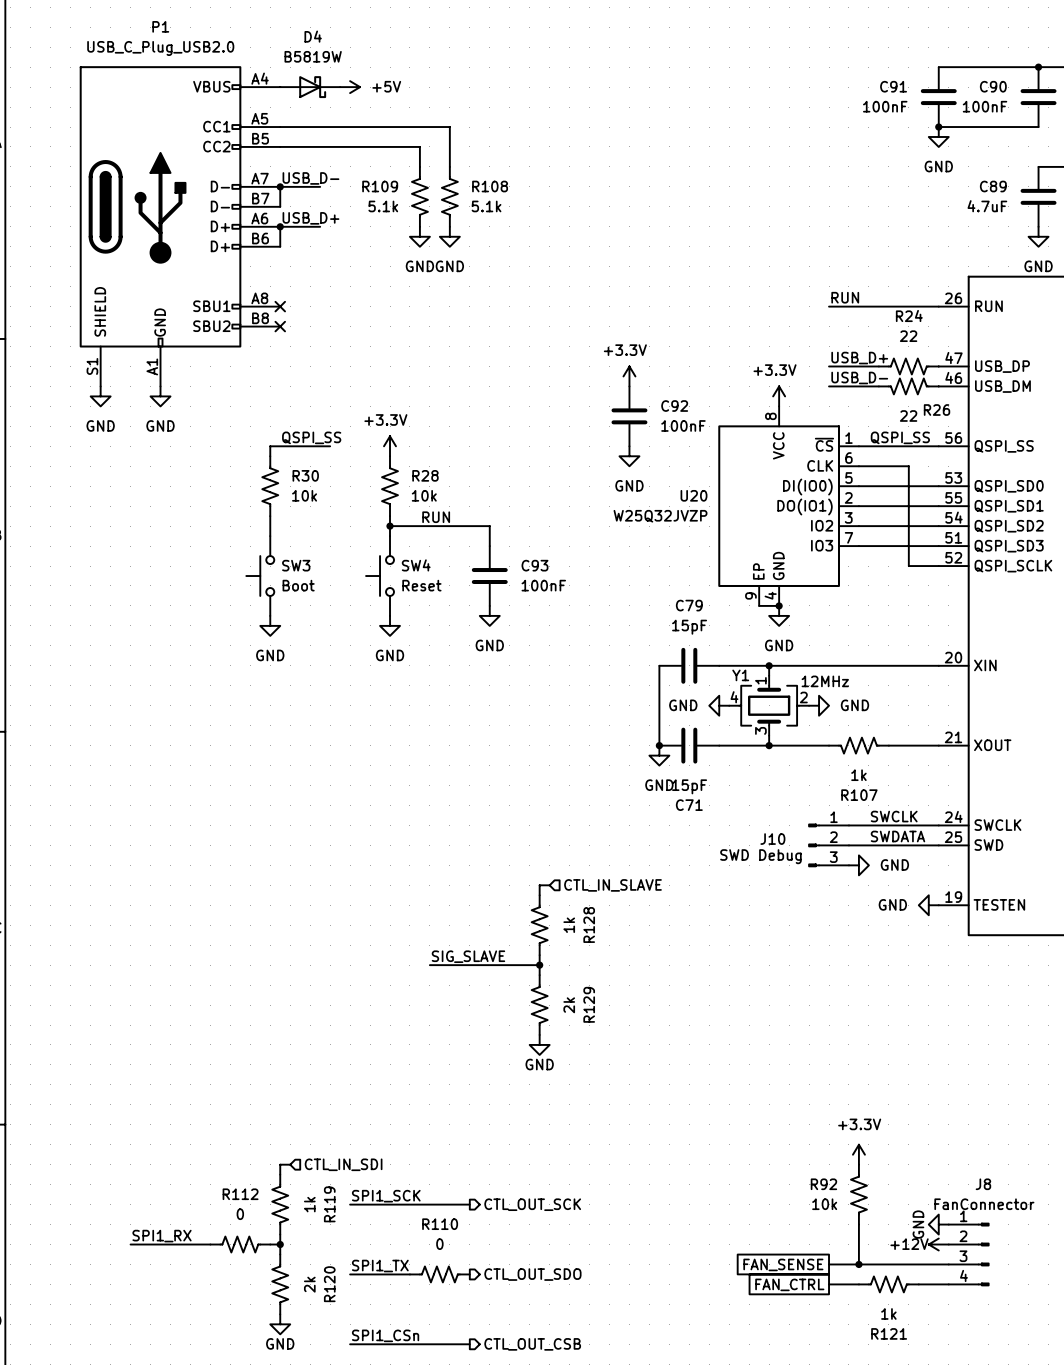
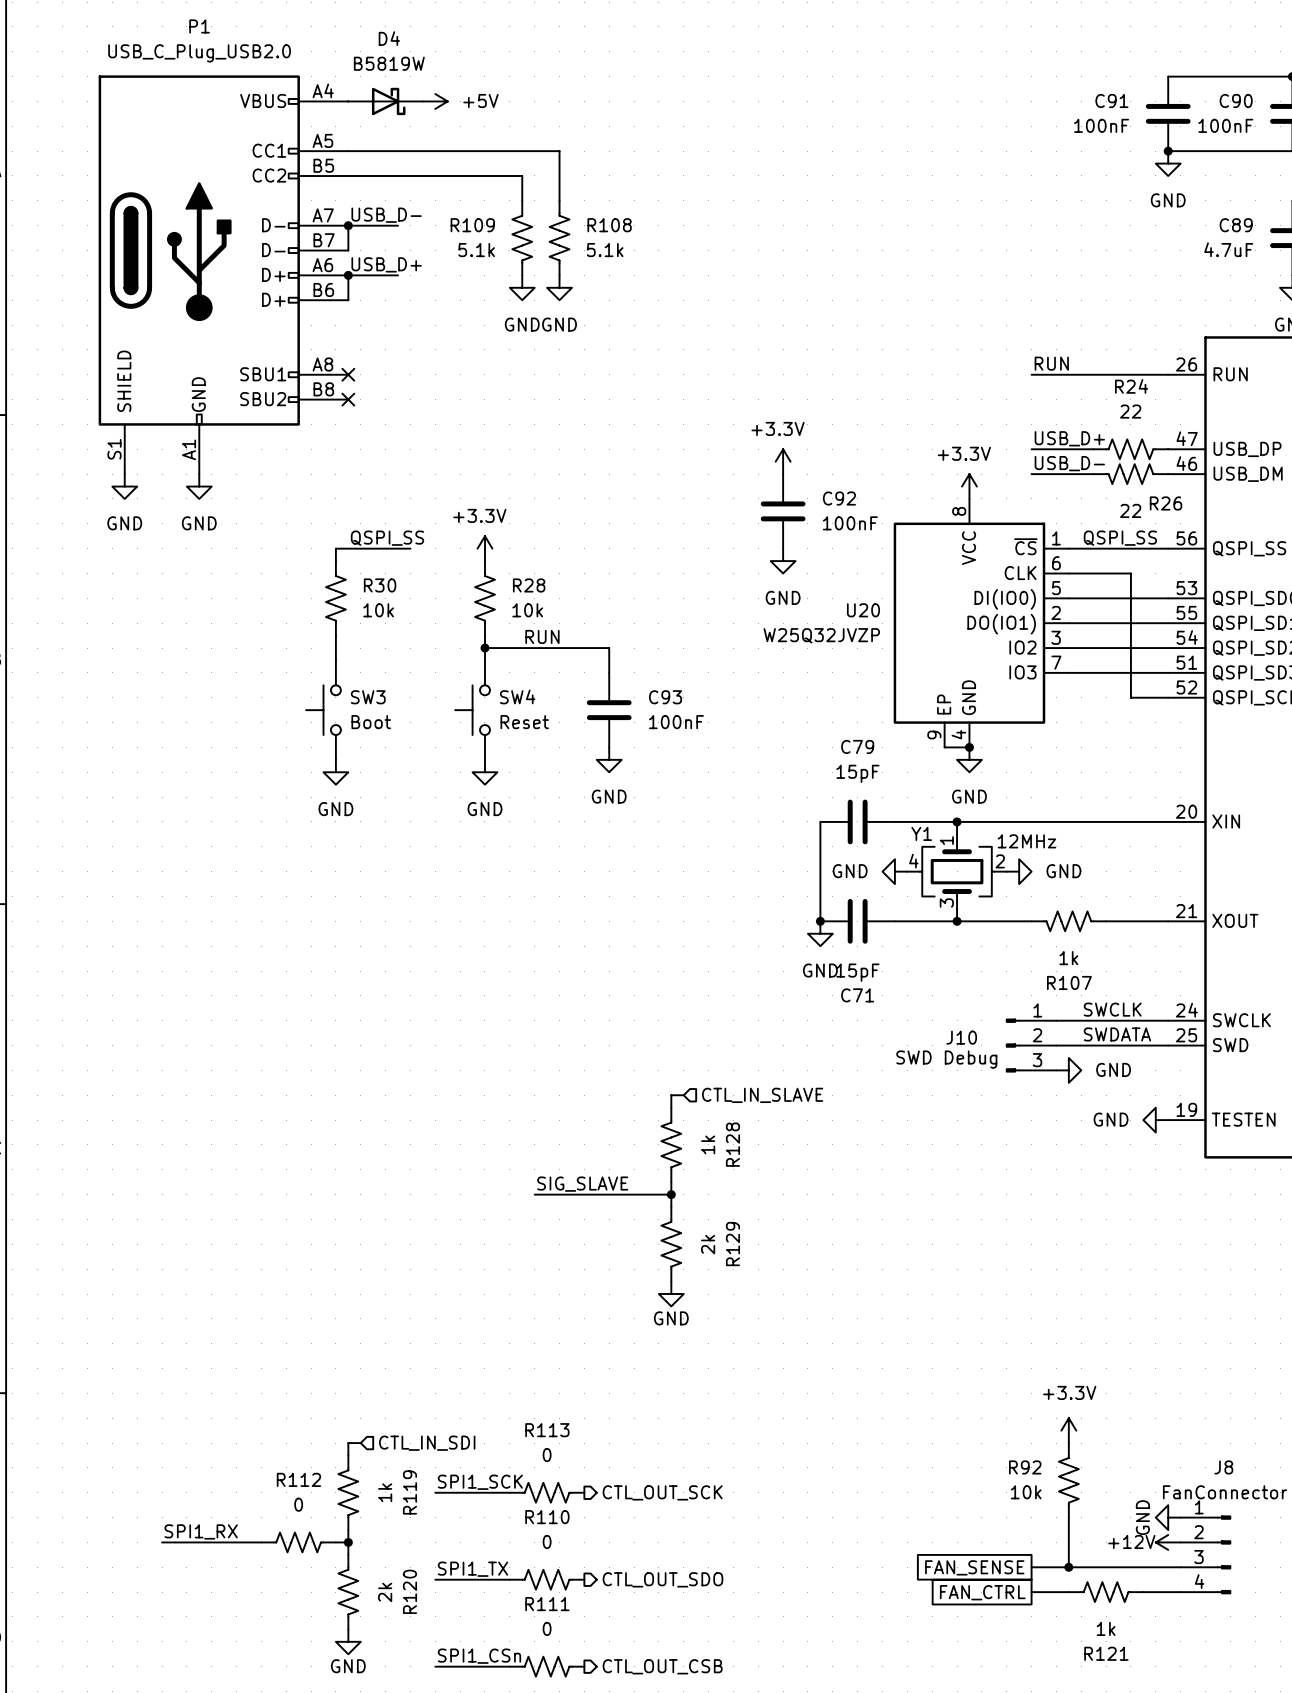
R113: none -> 0 (547, 1492)
R111: none -> 0 (547, 1666)

